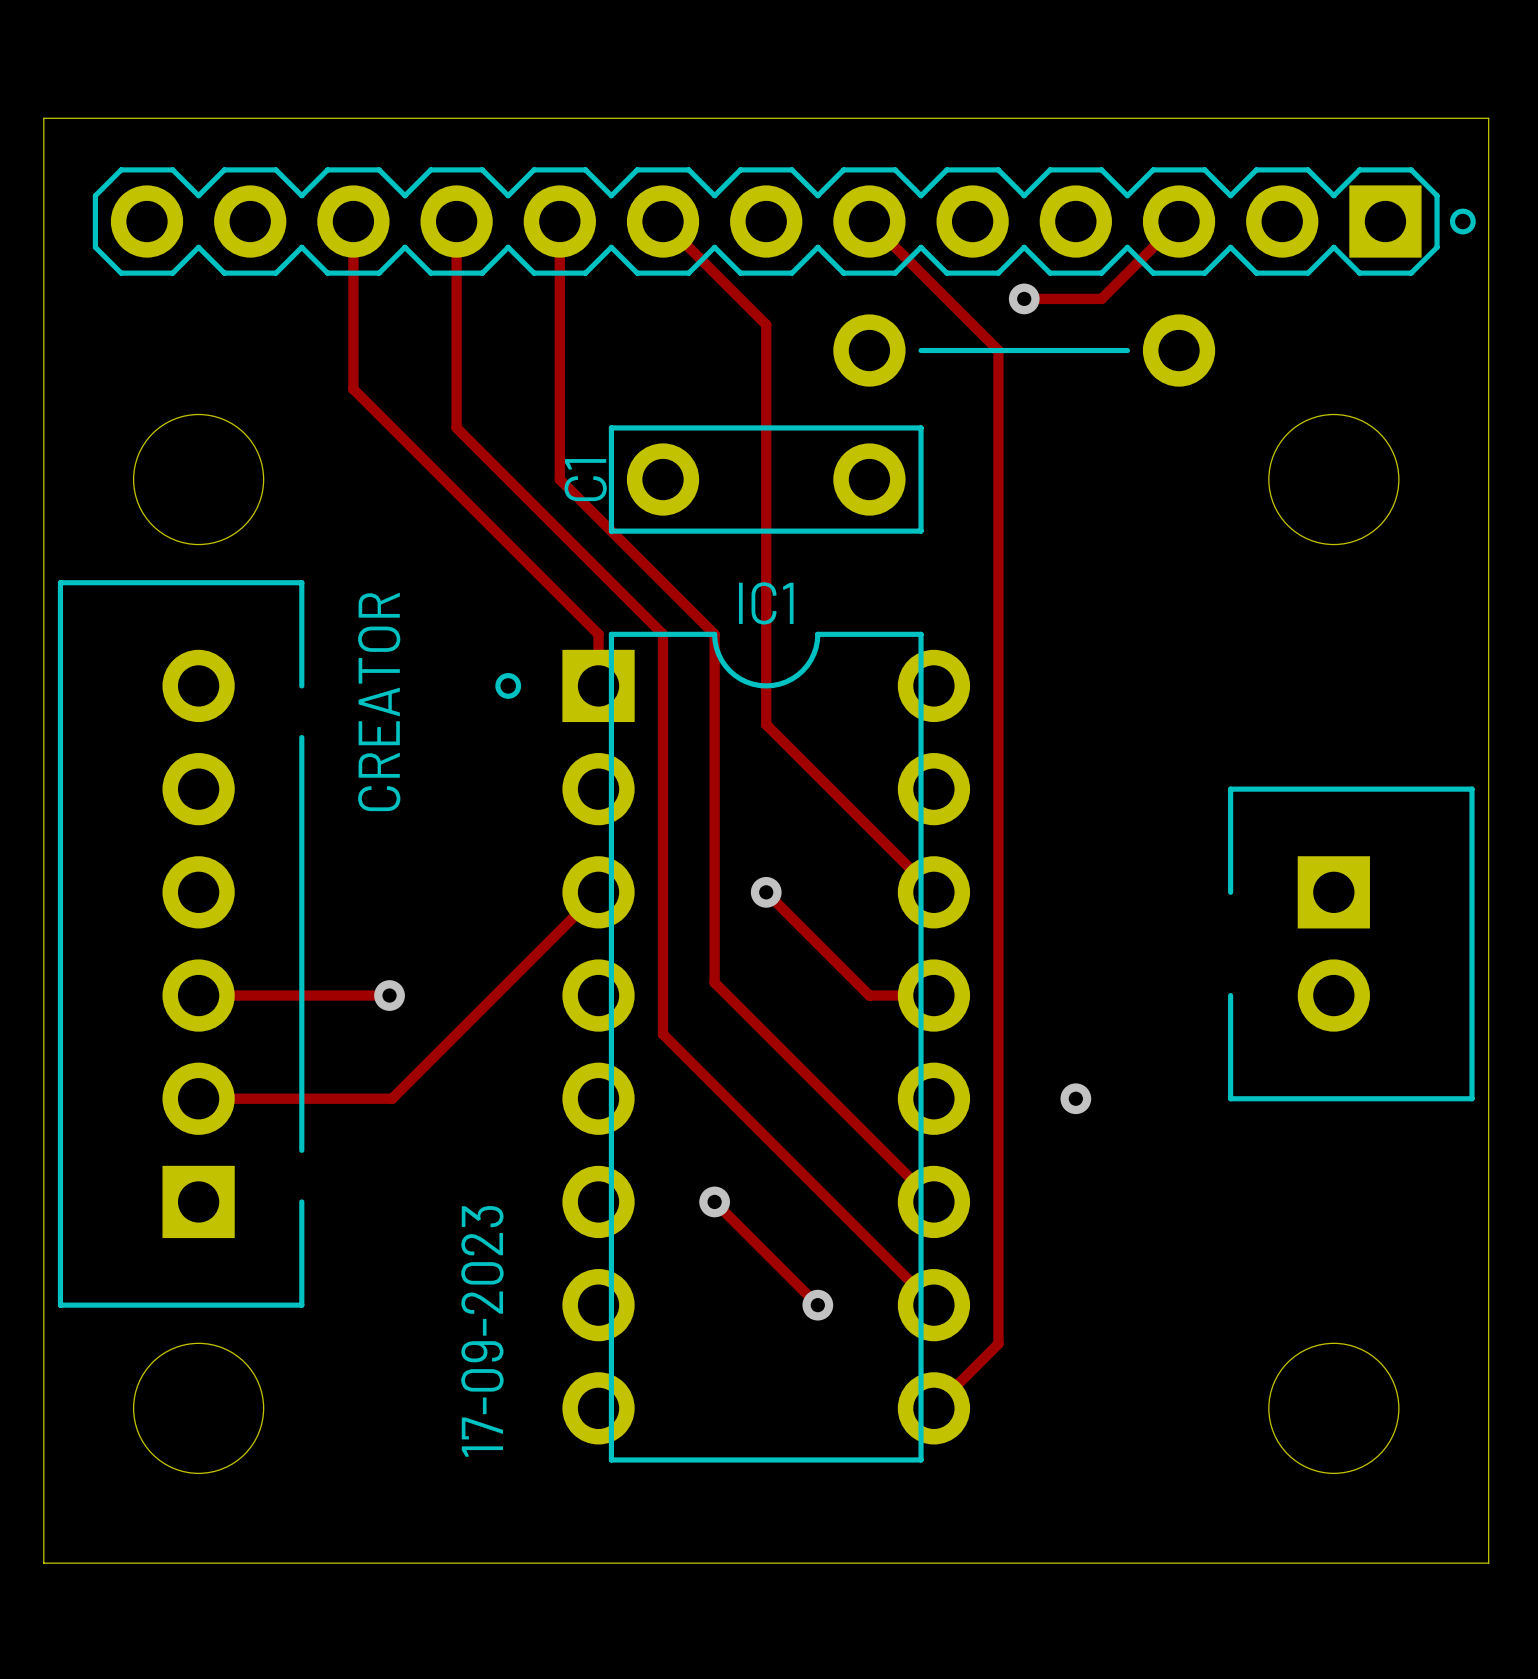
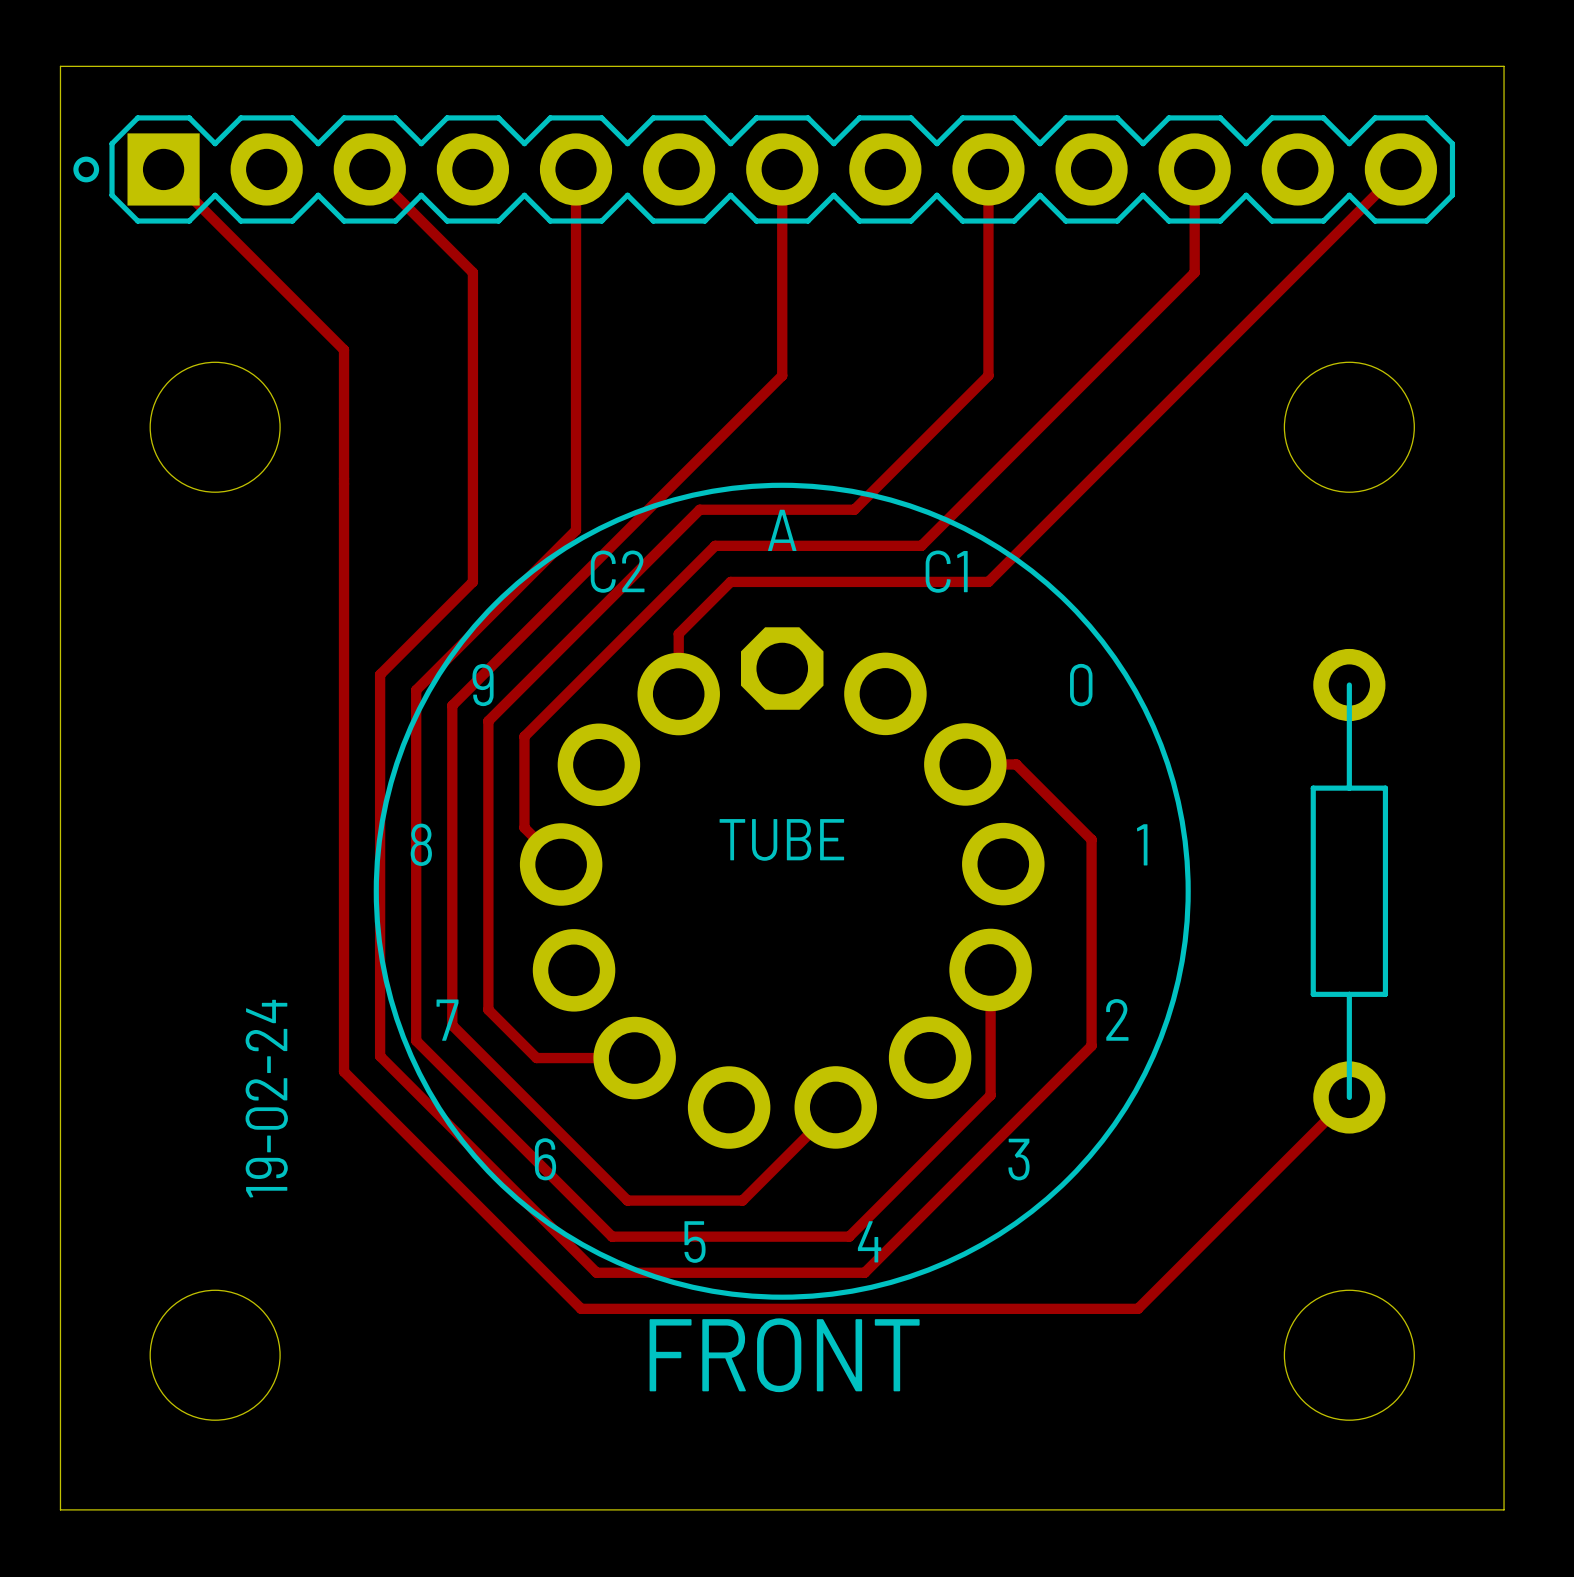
track: none -> (163, 169) (344, 349) (344, 1071) (581, 1308) (1137, 1308) (1349, 1097)
track: (353, 221) (353, 389) (598, 634) (598, 685) -> none
track: (456, 221) (456, 324) -> (369, 169) (472, 272)
track: (663, 221) (766, 324) -> (782, 169) (782, 272)
part rotation: 0° (784, 221) -> 180° (764, 169)
track: (869, 221) (998, 350) (998, 1343) (933, 1408) -> none
track: none -> (988, 169) (988, 375) (854, 509) (699, 509) (488, 721) (488, 1009) (536, 1058) (634, 1058)
track: (1179, 221) (1101, 298) (1024, 298) -> (1194, 169) (1194, 272) (921, 545) (715, 545) (524, 736) (524, 827) (561, 864)
track: none -> (1400, 169) (988, 581) (730, 581) (678, 633) (678, 694)
via: (1024, 298) -> none
part: (1024, 350) -> none
track: (456, 427) (663, 634) (663, 1034) (933, 1305) -> (472, 375) (472, 581) (380, 674) (380, 1056) (596, 1272) (864, 1272) (1091, 1045) (1091, 839) (1016, 764) (965, 764)
track: (766, 427) (766, 724) (933, 892) -> (782, 375) (452, 705) (452, 1025) (627, 1200) (742, 1200) (835, 1107)
track: (559, 479) (714, 634) (714, 982) (933, 1201) -> (576, 427) (576, 530) (416, 690) (416, 1040) (612, 1236) (849, 1236) (990, 1095) (990, 969)
C1: (766, 479) -> none
CREATOR: (379, 701) -> none
part footprint: [1228, 786, 1475, 1102] -> [1310, 648, 1389, 1134]
track: (598, 892) (392, 1098) (198, 1098) -> none
track: (766, 892) (869, 995) (933, 995) -> none
via: (766, 892) -> none
part: (181, 943) -> none
TUBE: none -> (782, 891)
track: (198, 995) (389, 995) -> none
via: (389, 995) -> none
IC1: (732, 1047) -> none
drawing: none -> [245, 999, 288, 1198]
via: (1075, 1098) -> none
track: (714, 1201) (817, 1305) -> none
via: (714, 1201) -> none
drawing: [461, 1206, 504, 1457] -> none
via: (817, 1305) -> none

